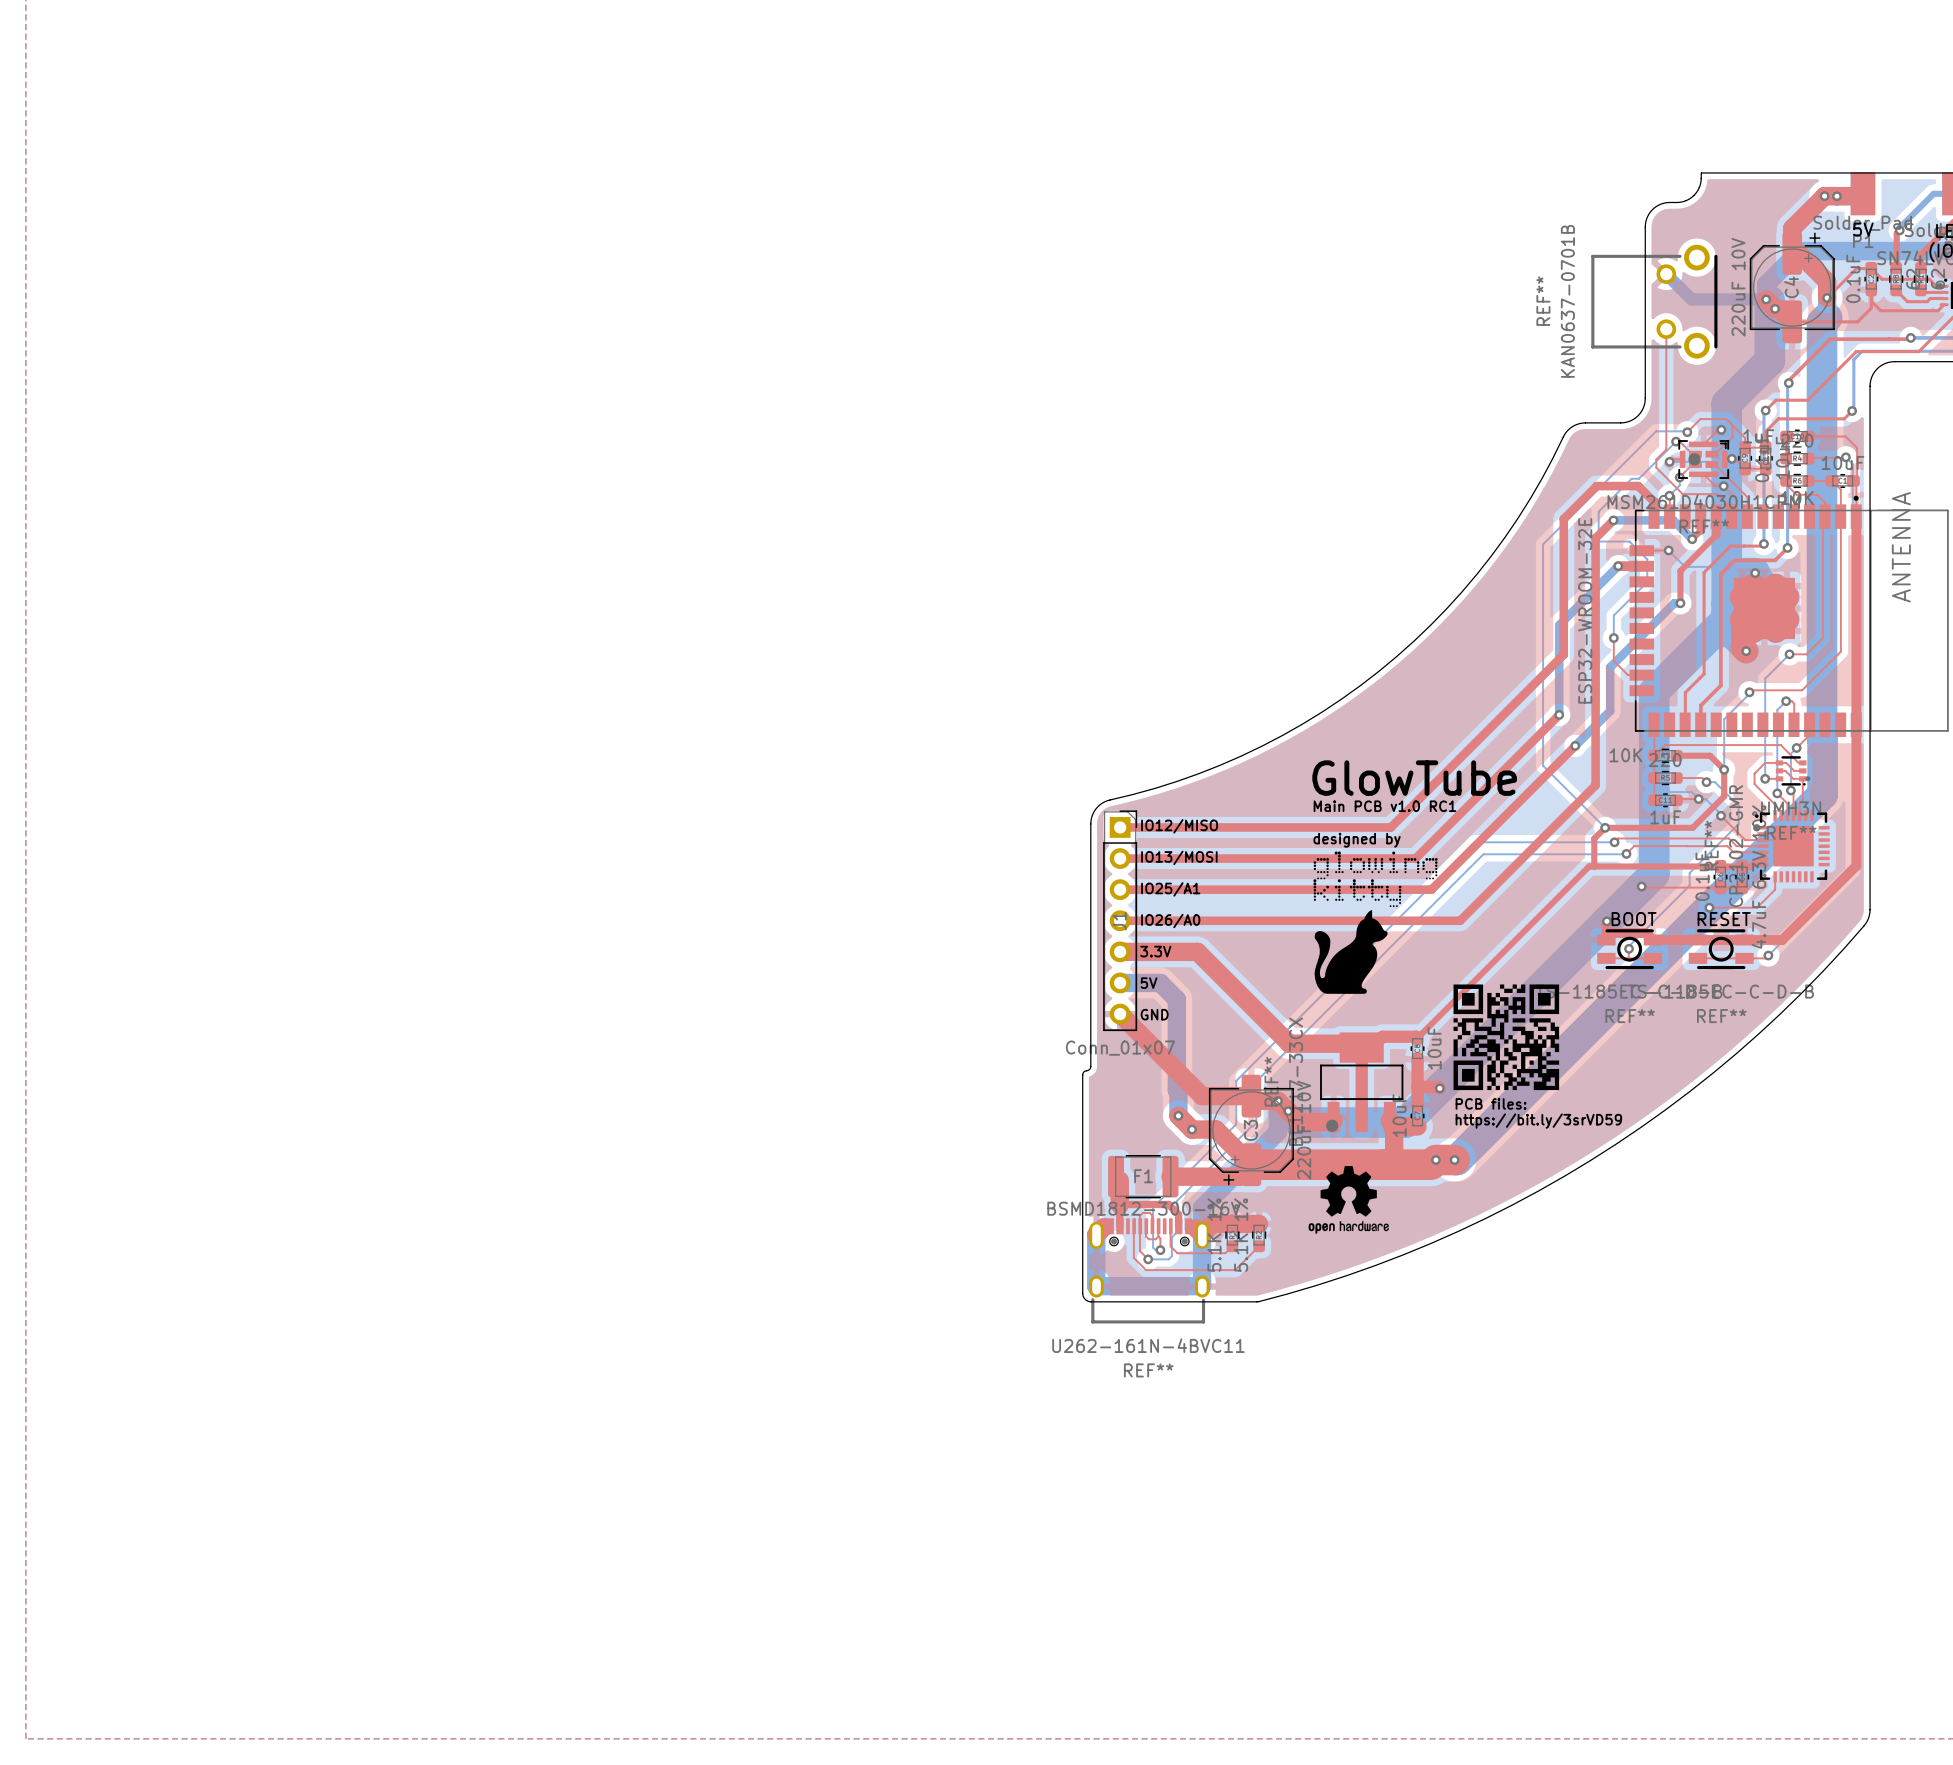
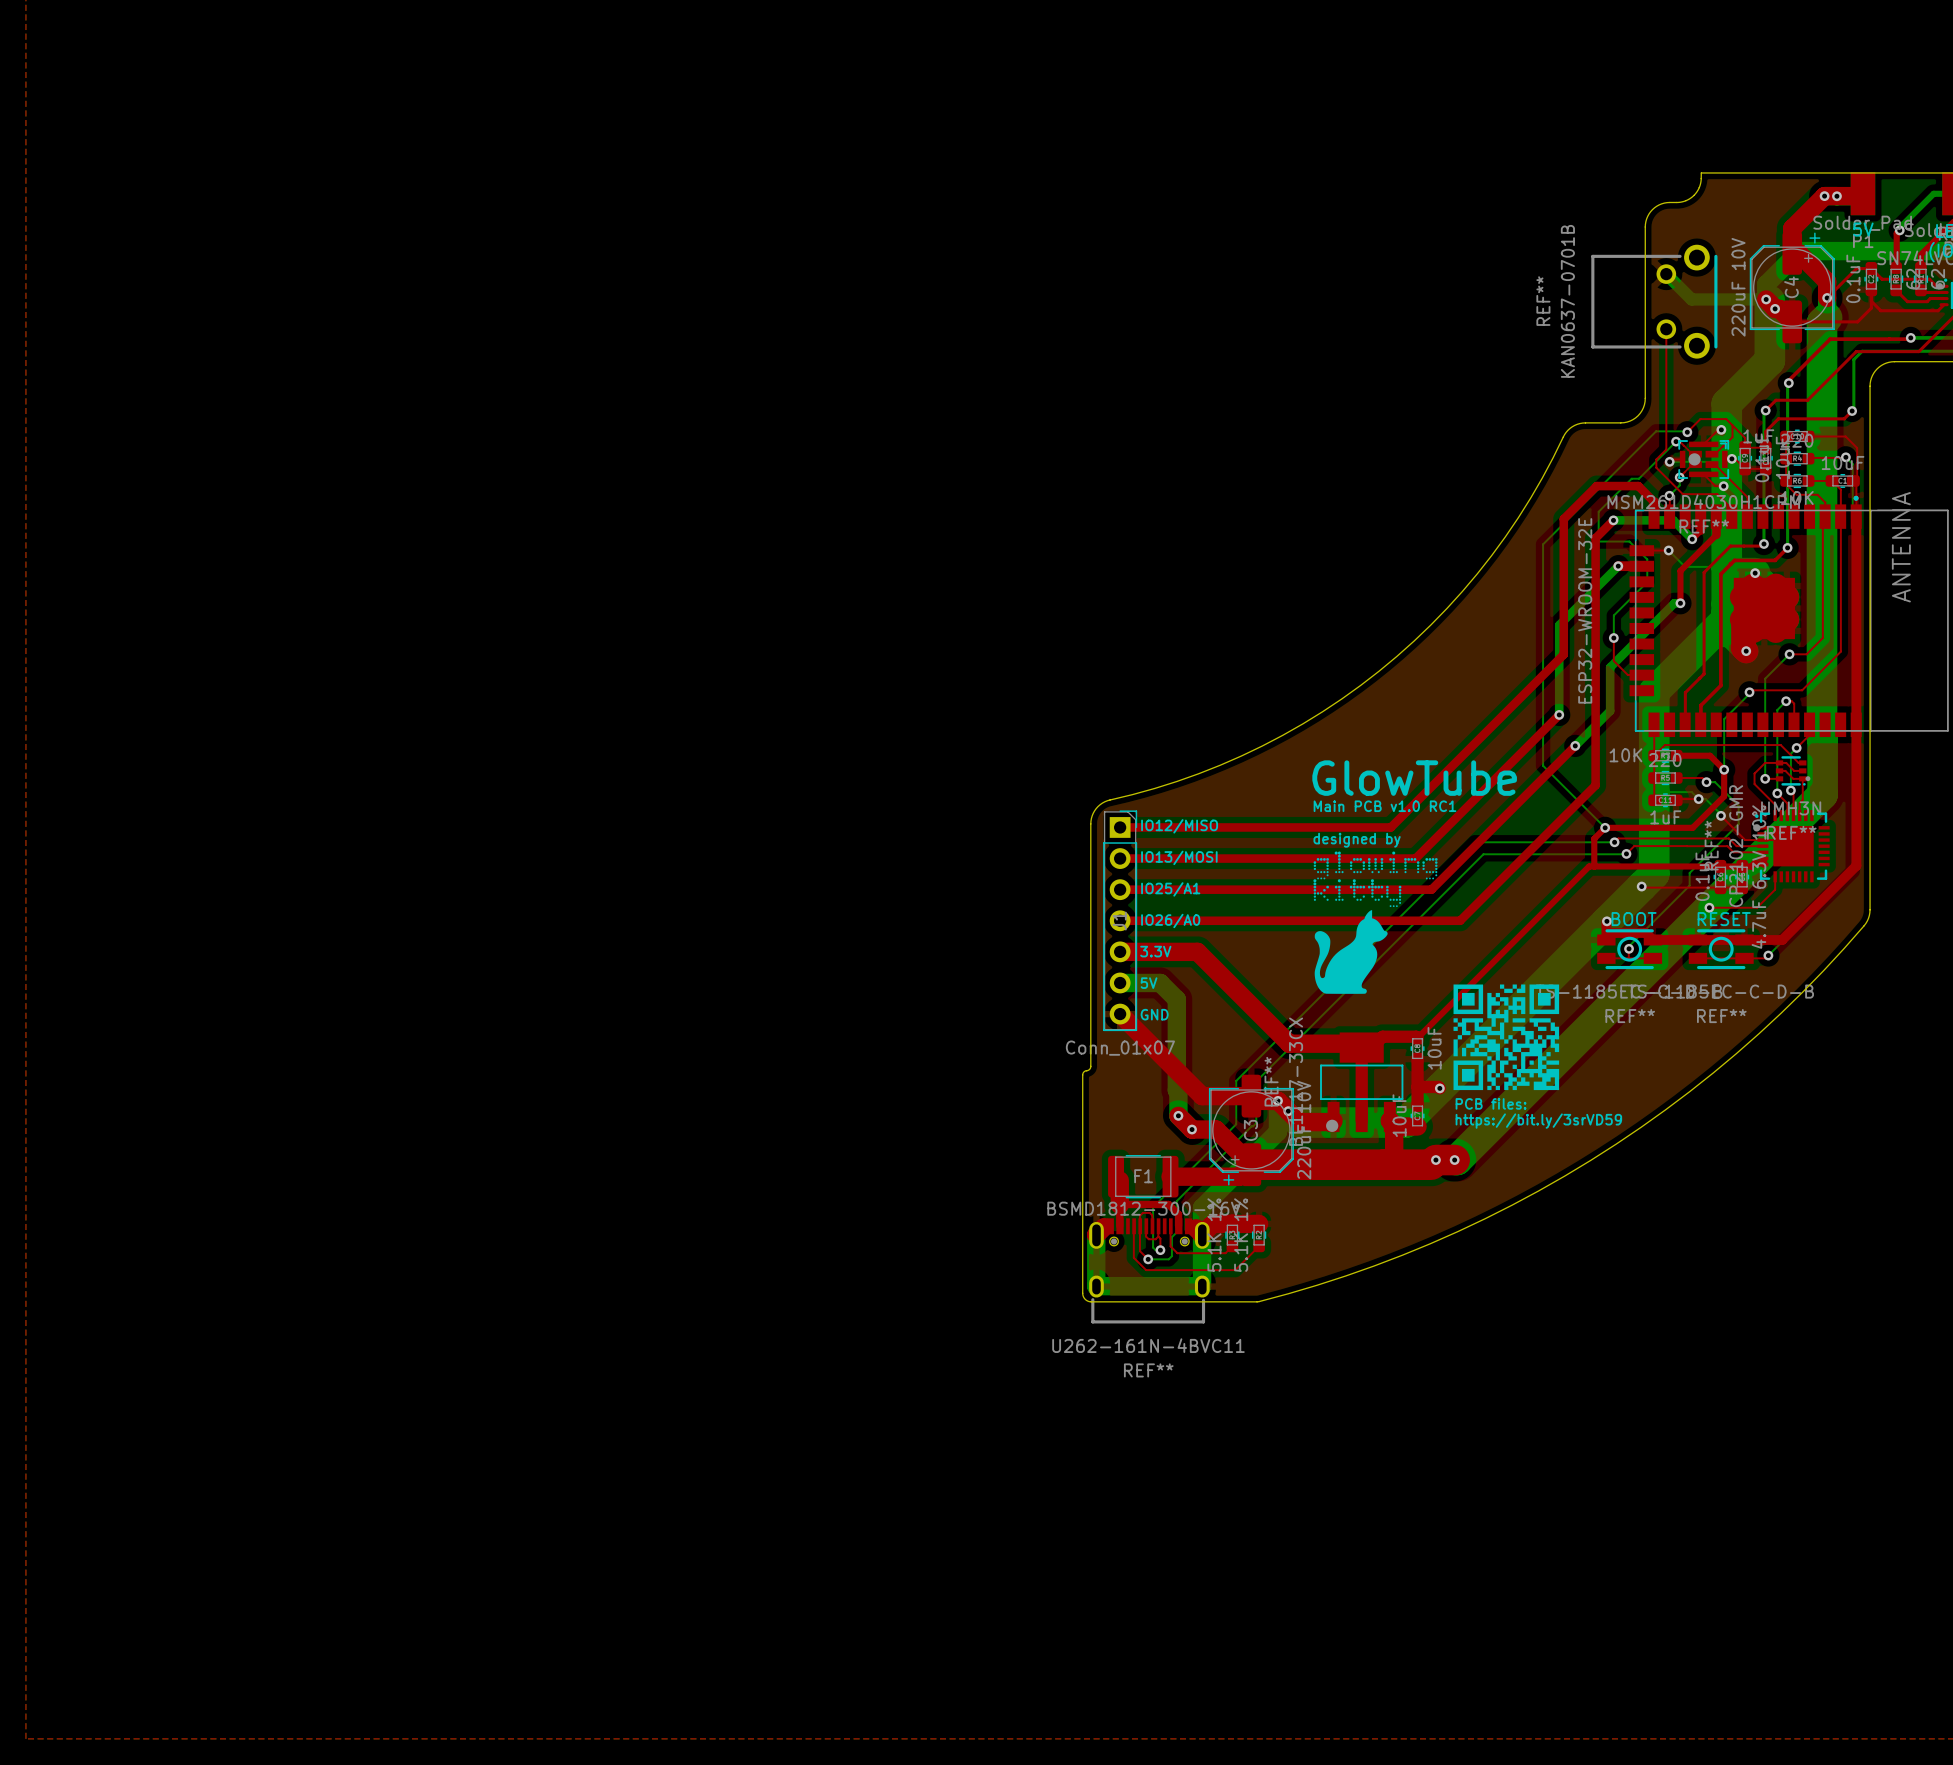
drawing: [1308, 1166, 1389, 1234] -> none

